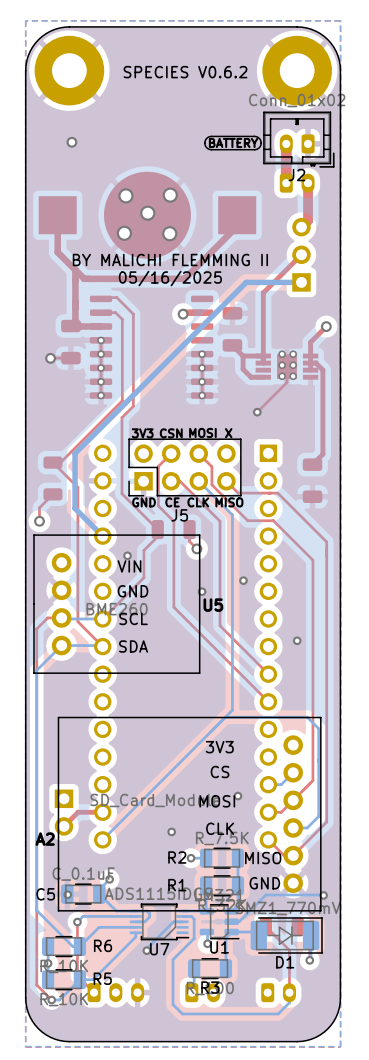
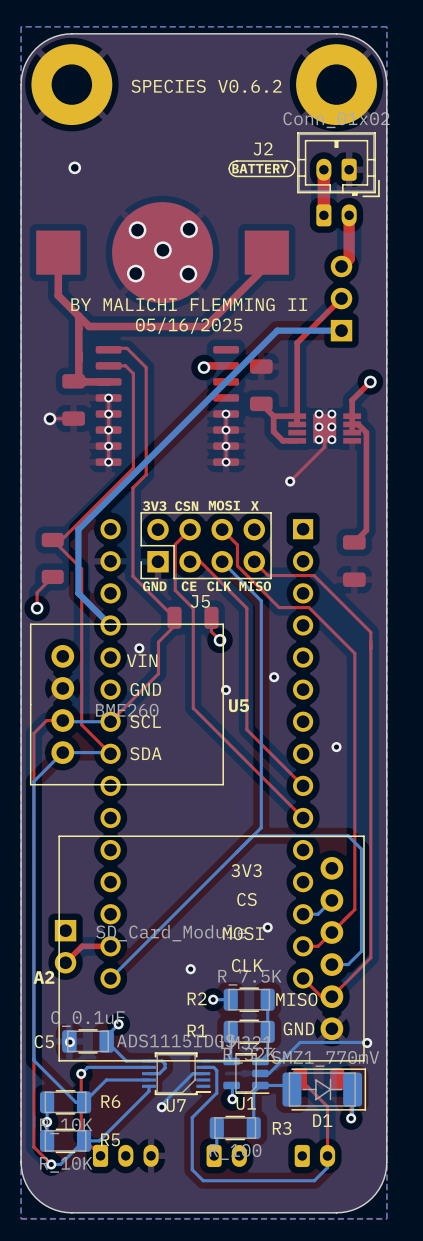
J2 name position: J2 (296, 175) -> J2 (263, 148)
R3 name position: R3 (210, 987) -> R3 (282, 1128)

